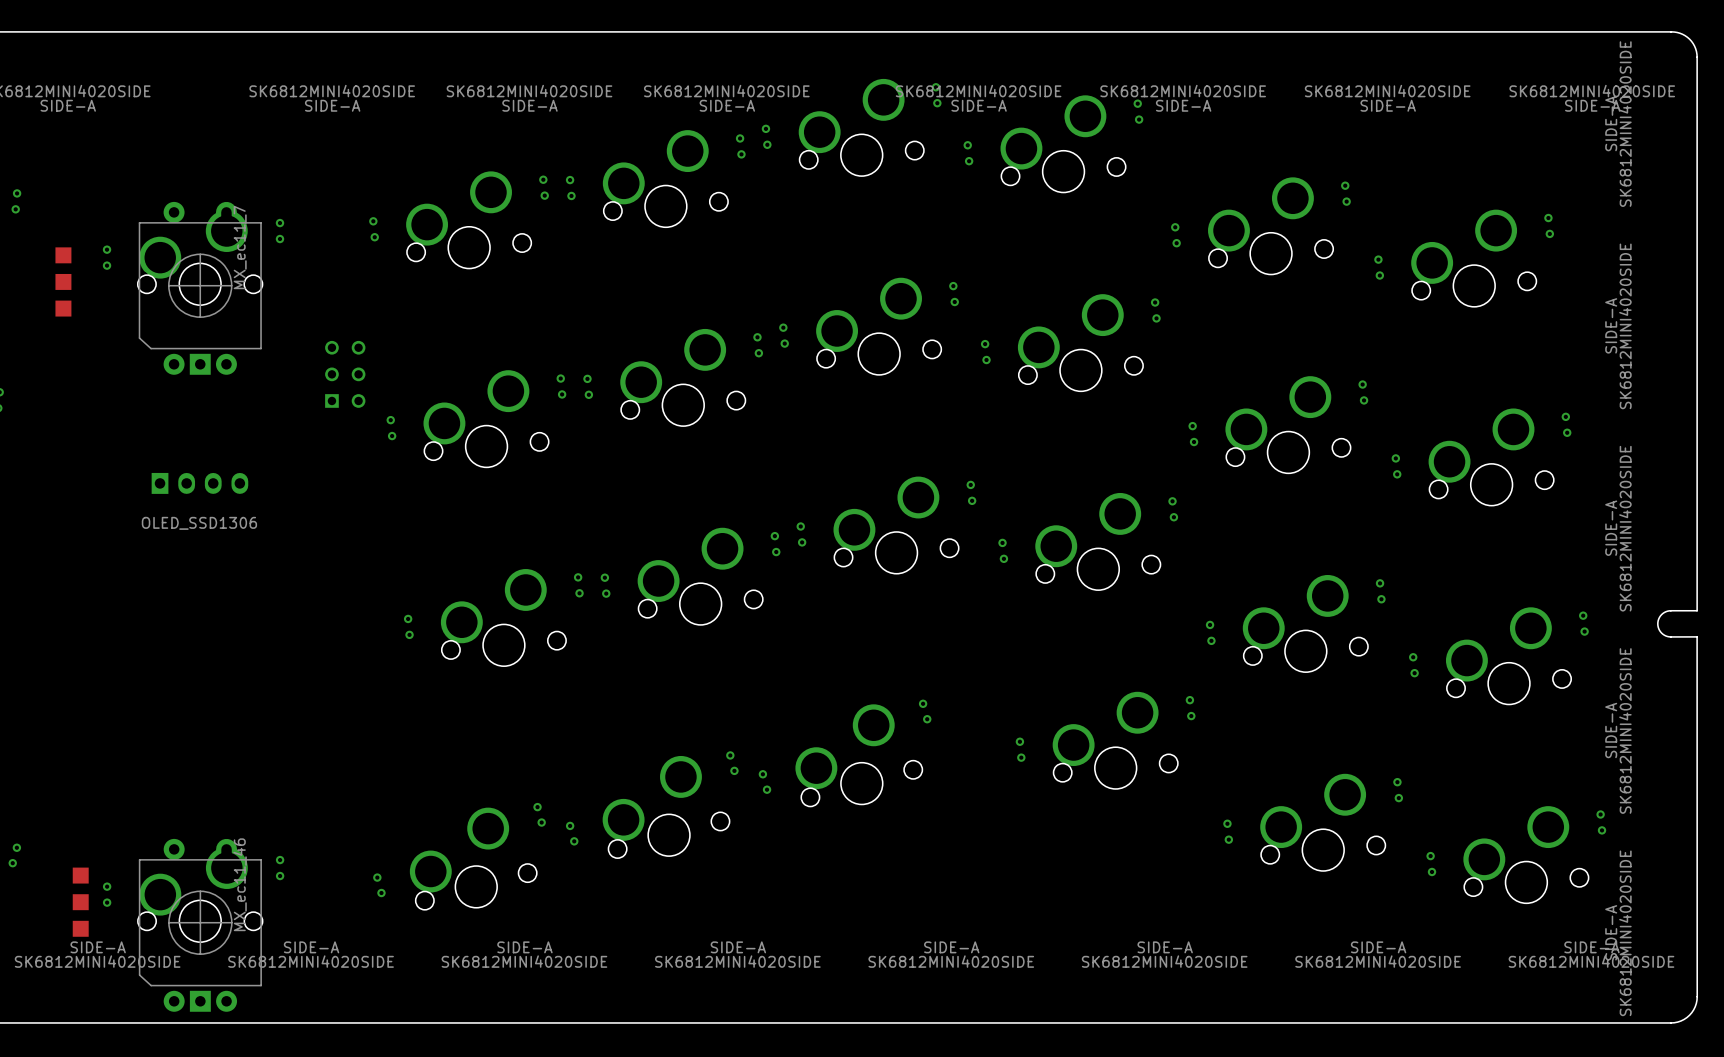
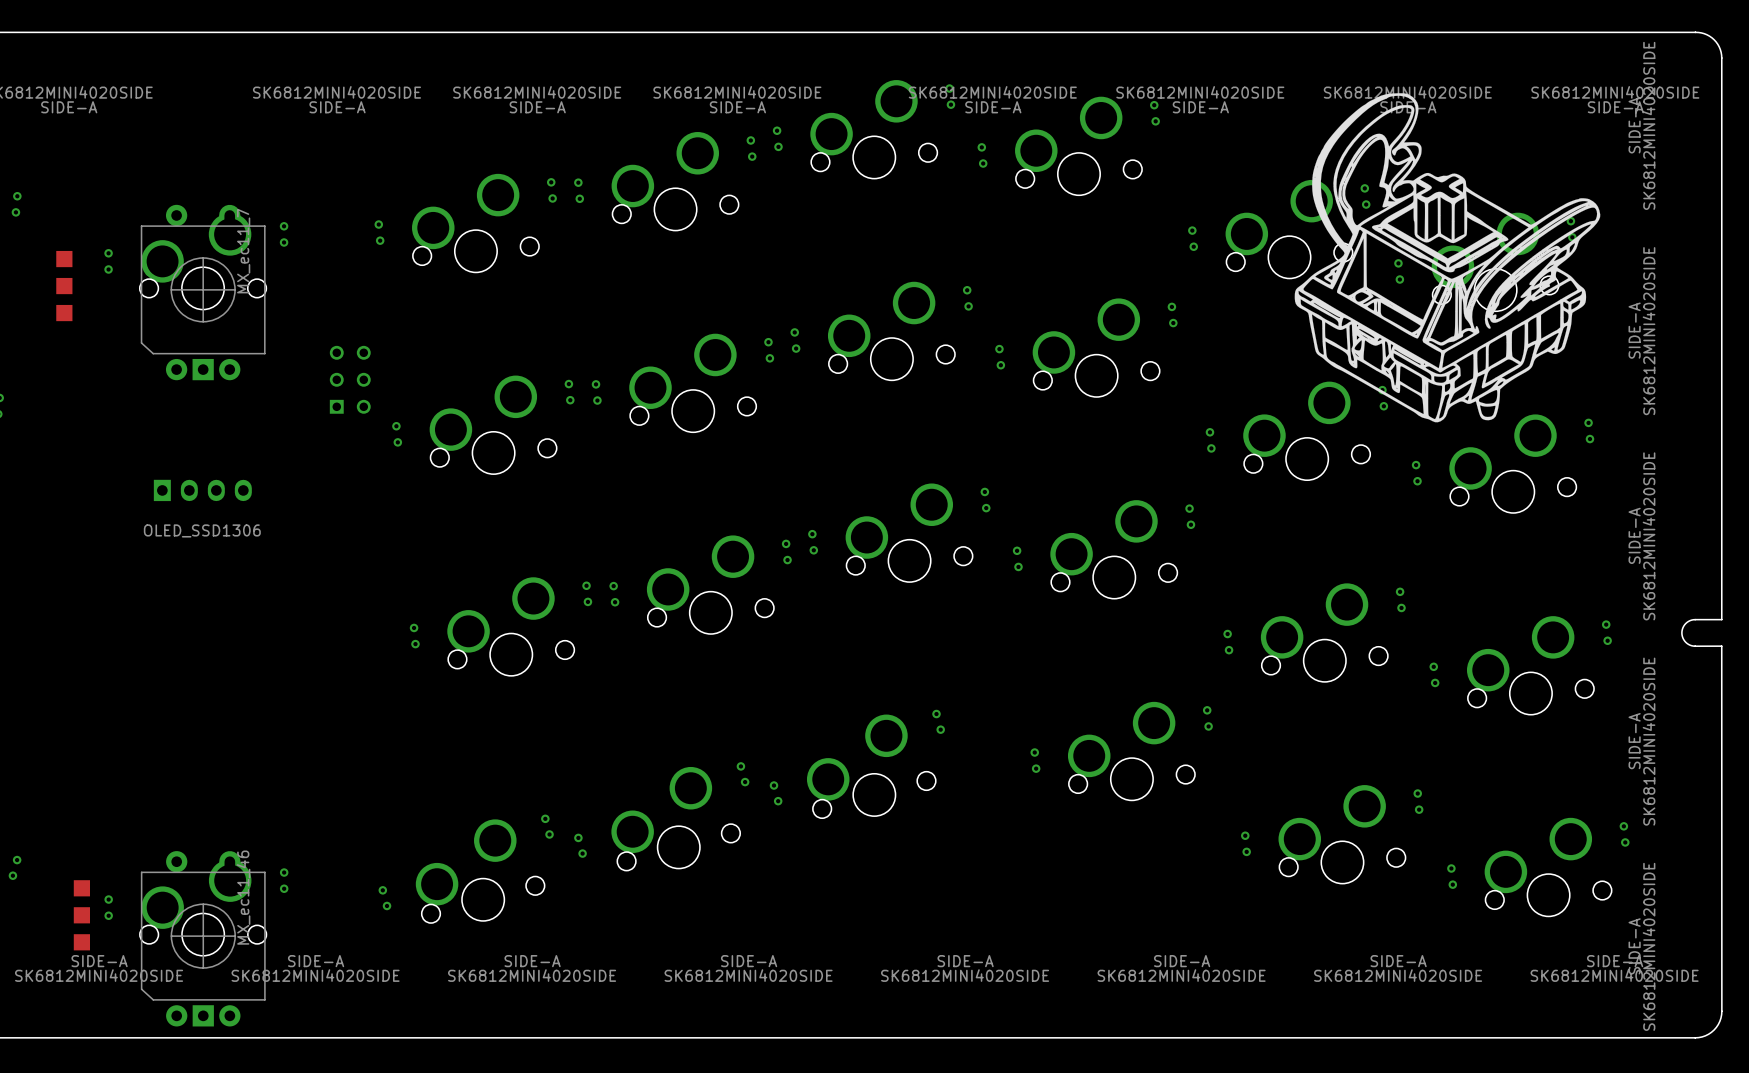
drawing: none -> [1294, 93, 1601, 423]

